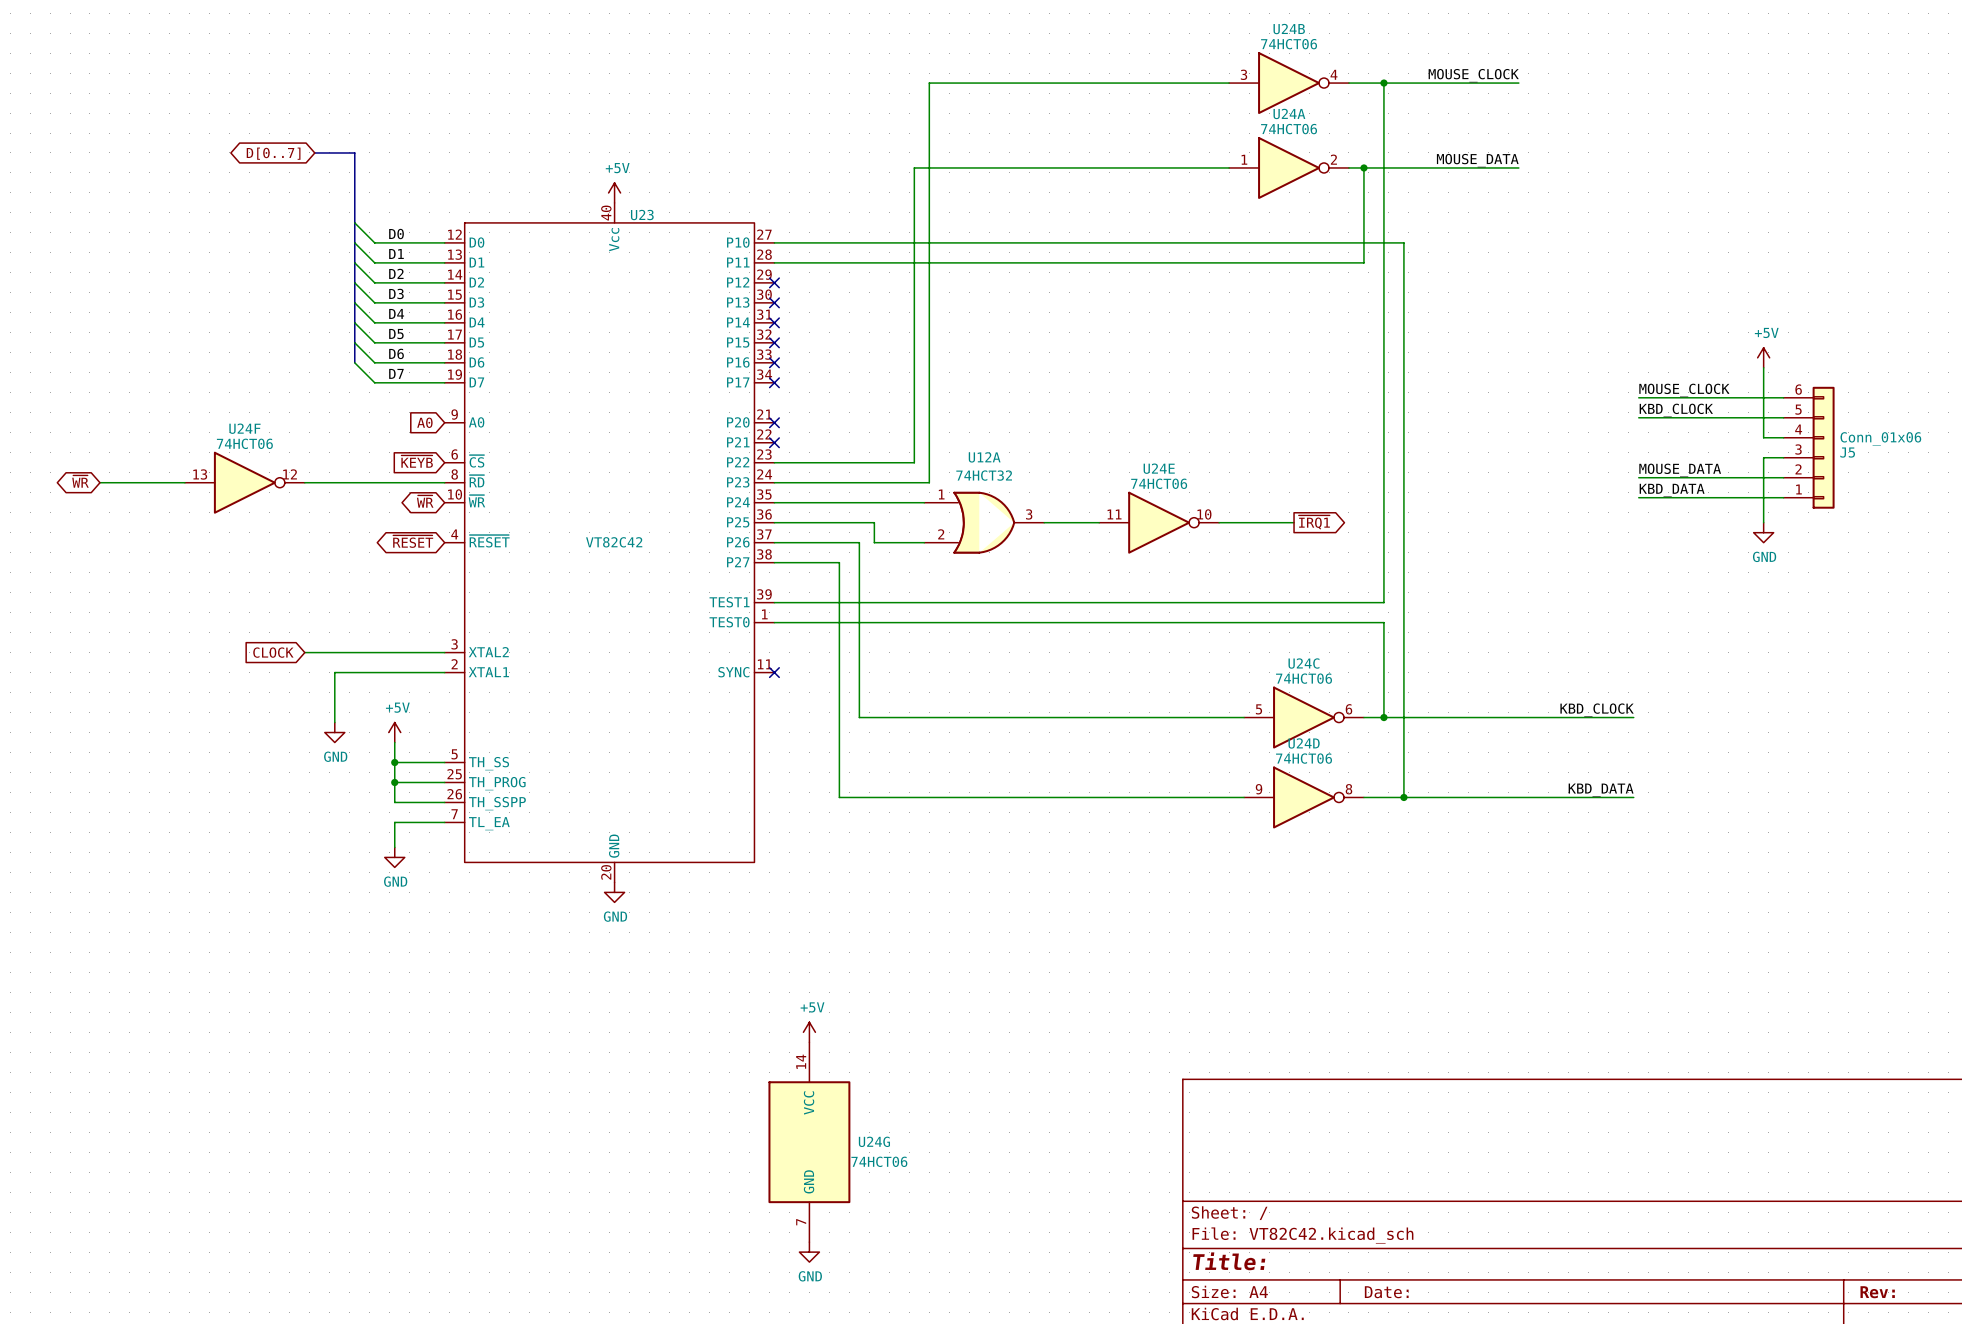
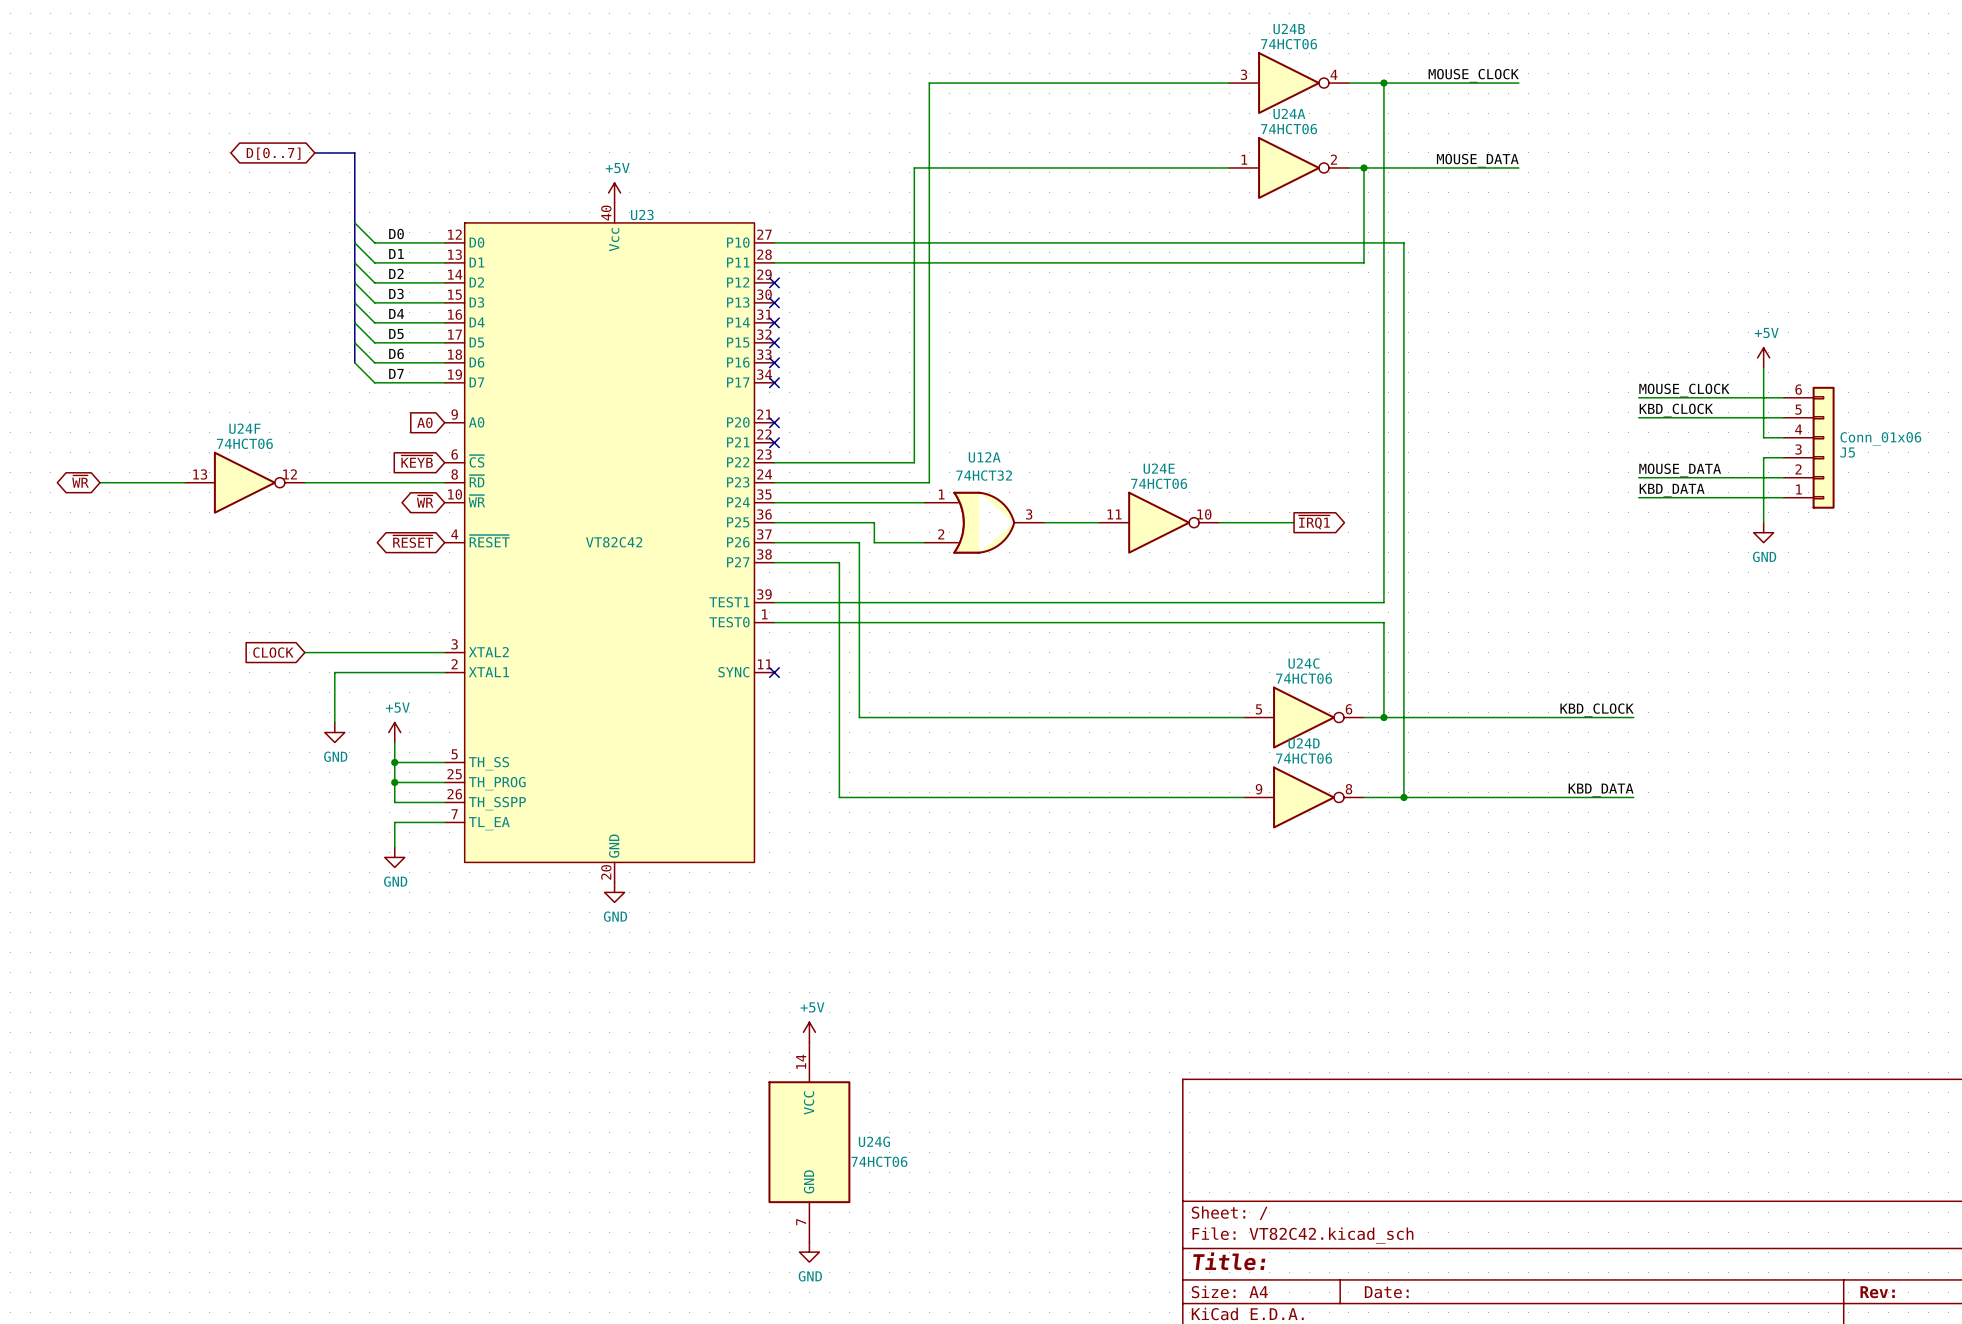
U23 symbol: [444, 202, 775, 883] -> [444, 202, 775, 883]

